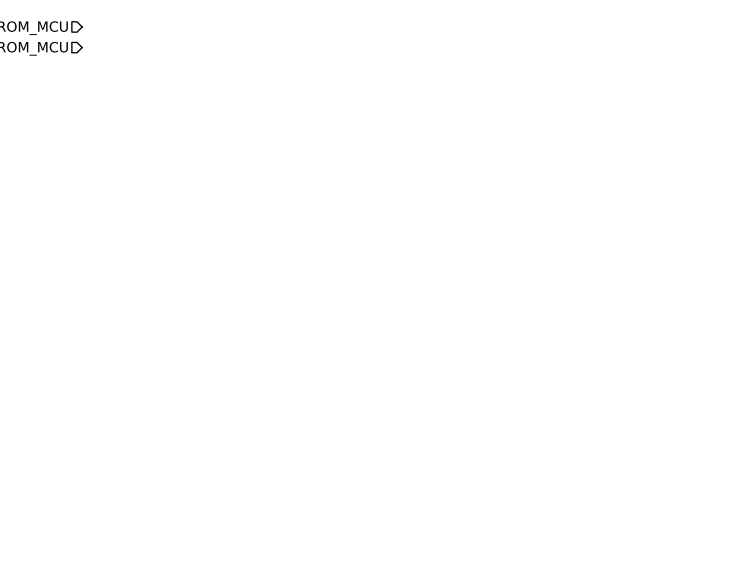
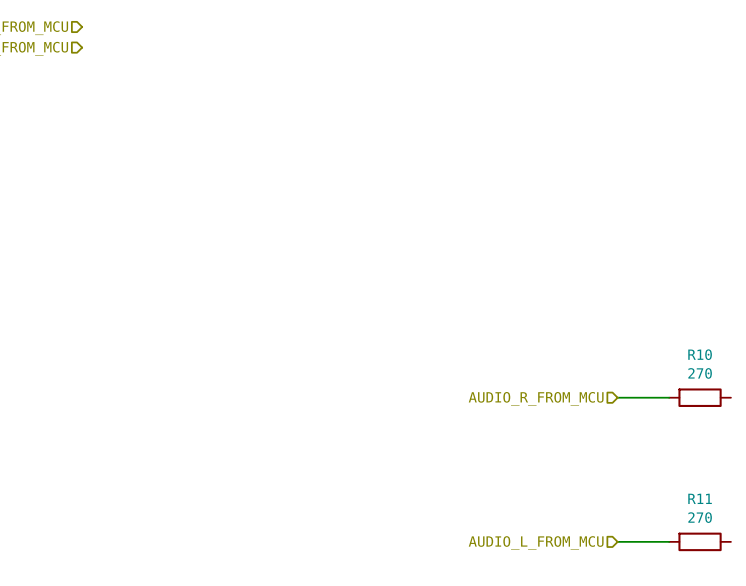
wire: none -> (617, 397) (669, 397)
R10: none -> 270 (700, 397)
hierarchical label: none -> AUDIO_R_FROM_MCU (536, 398)
wire: none -> (617, 541) (669, 541)
R11: none -> 270 (700, 541)
hierarchical label: none -> AUDIO_L_FROM_MCU (536, 543)

